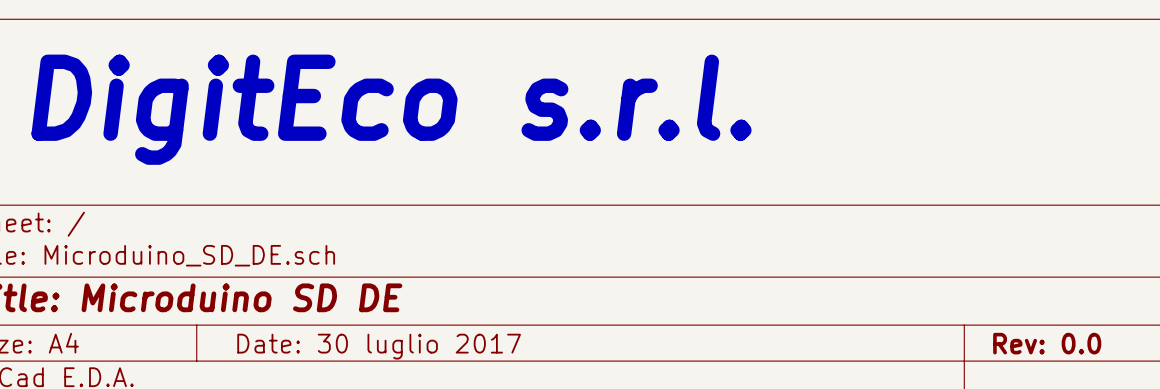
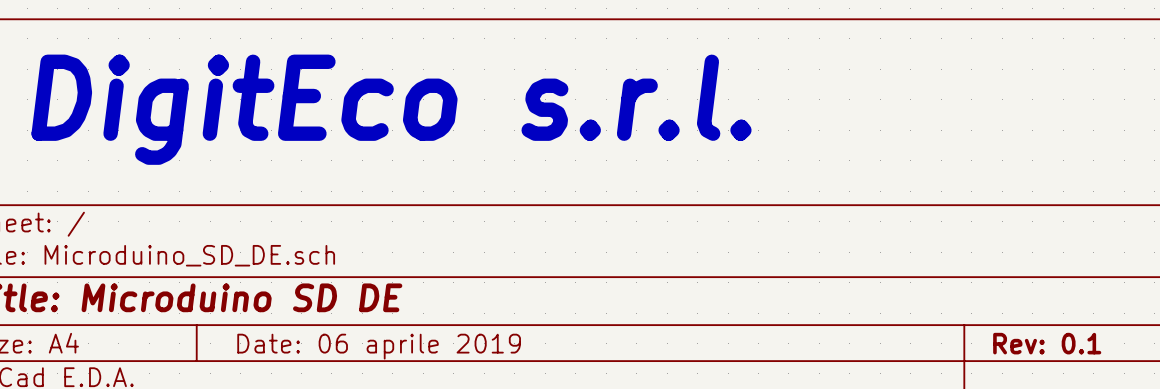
title block: Rev: 0.0 (1047, 343) -> Rev: 0.1 (1047, 343)
title block: Date: 30 luglio 2017 (379, 346) -> Date: 06 aprile 2019 (379, 346)

